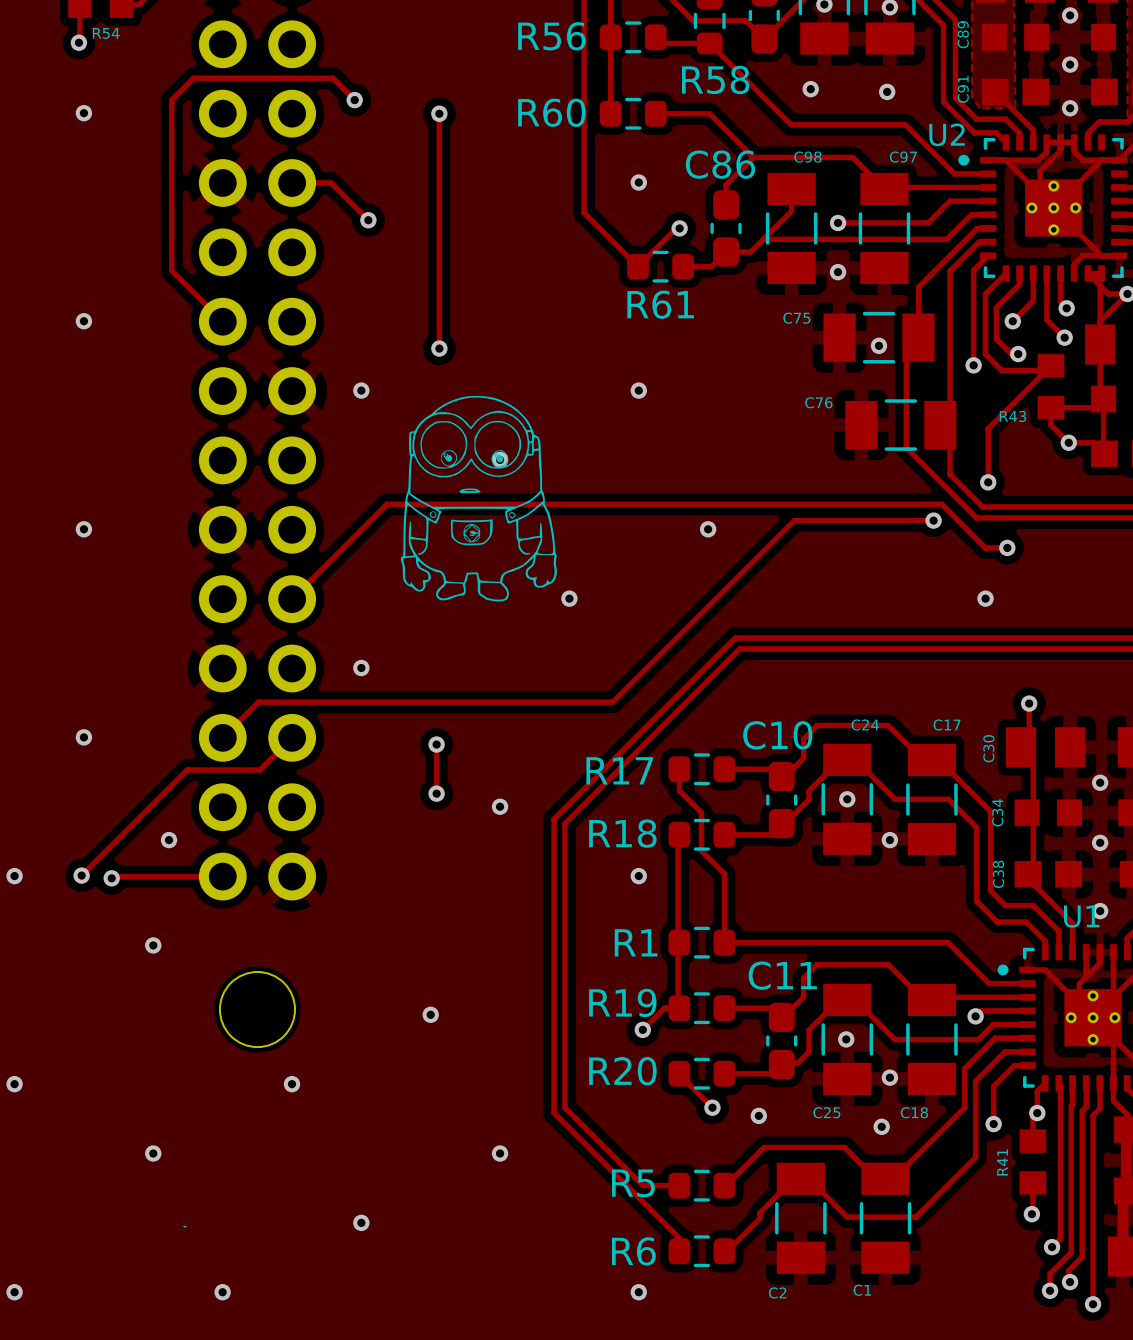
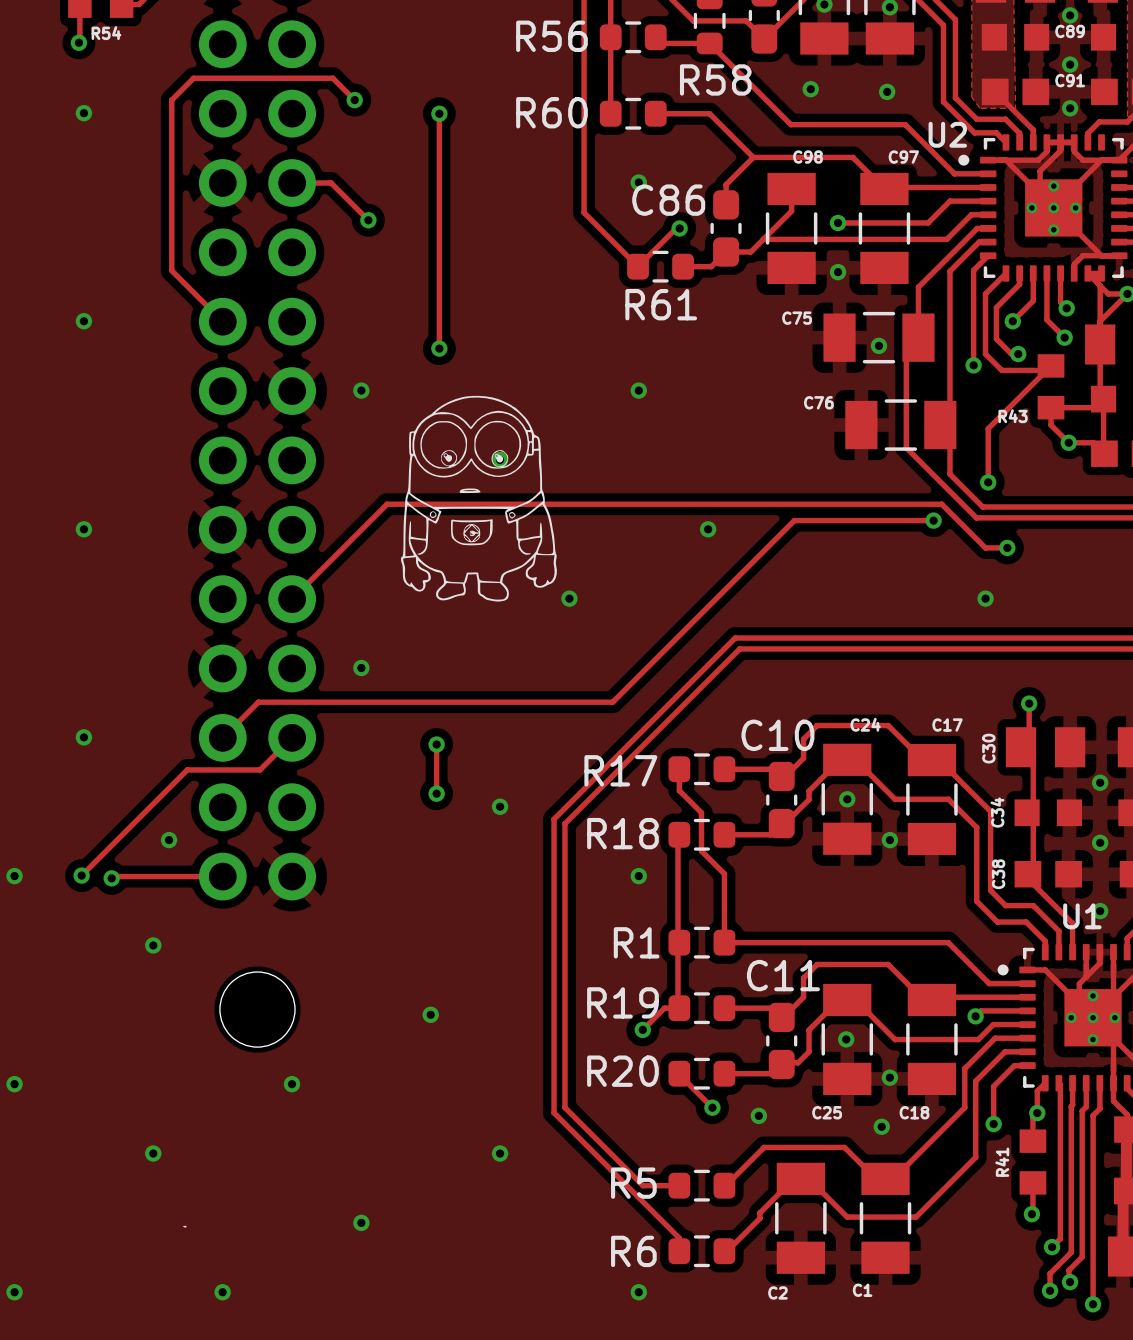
C89 name rotation: 0° (963, 34) -> 90° clockwise (1070, 31)
C89 name position: C89 (963, 34) -> C89 (1070, 31)
C91 name rotation: 0° (963, 89) -> 90° clockwise (1070, 80)
C91 name position: C91 (963, 89) -> C91 (1070, 80)
C86 name position: C86 (720, 164) -> C86 (668, 200)

